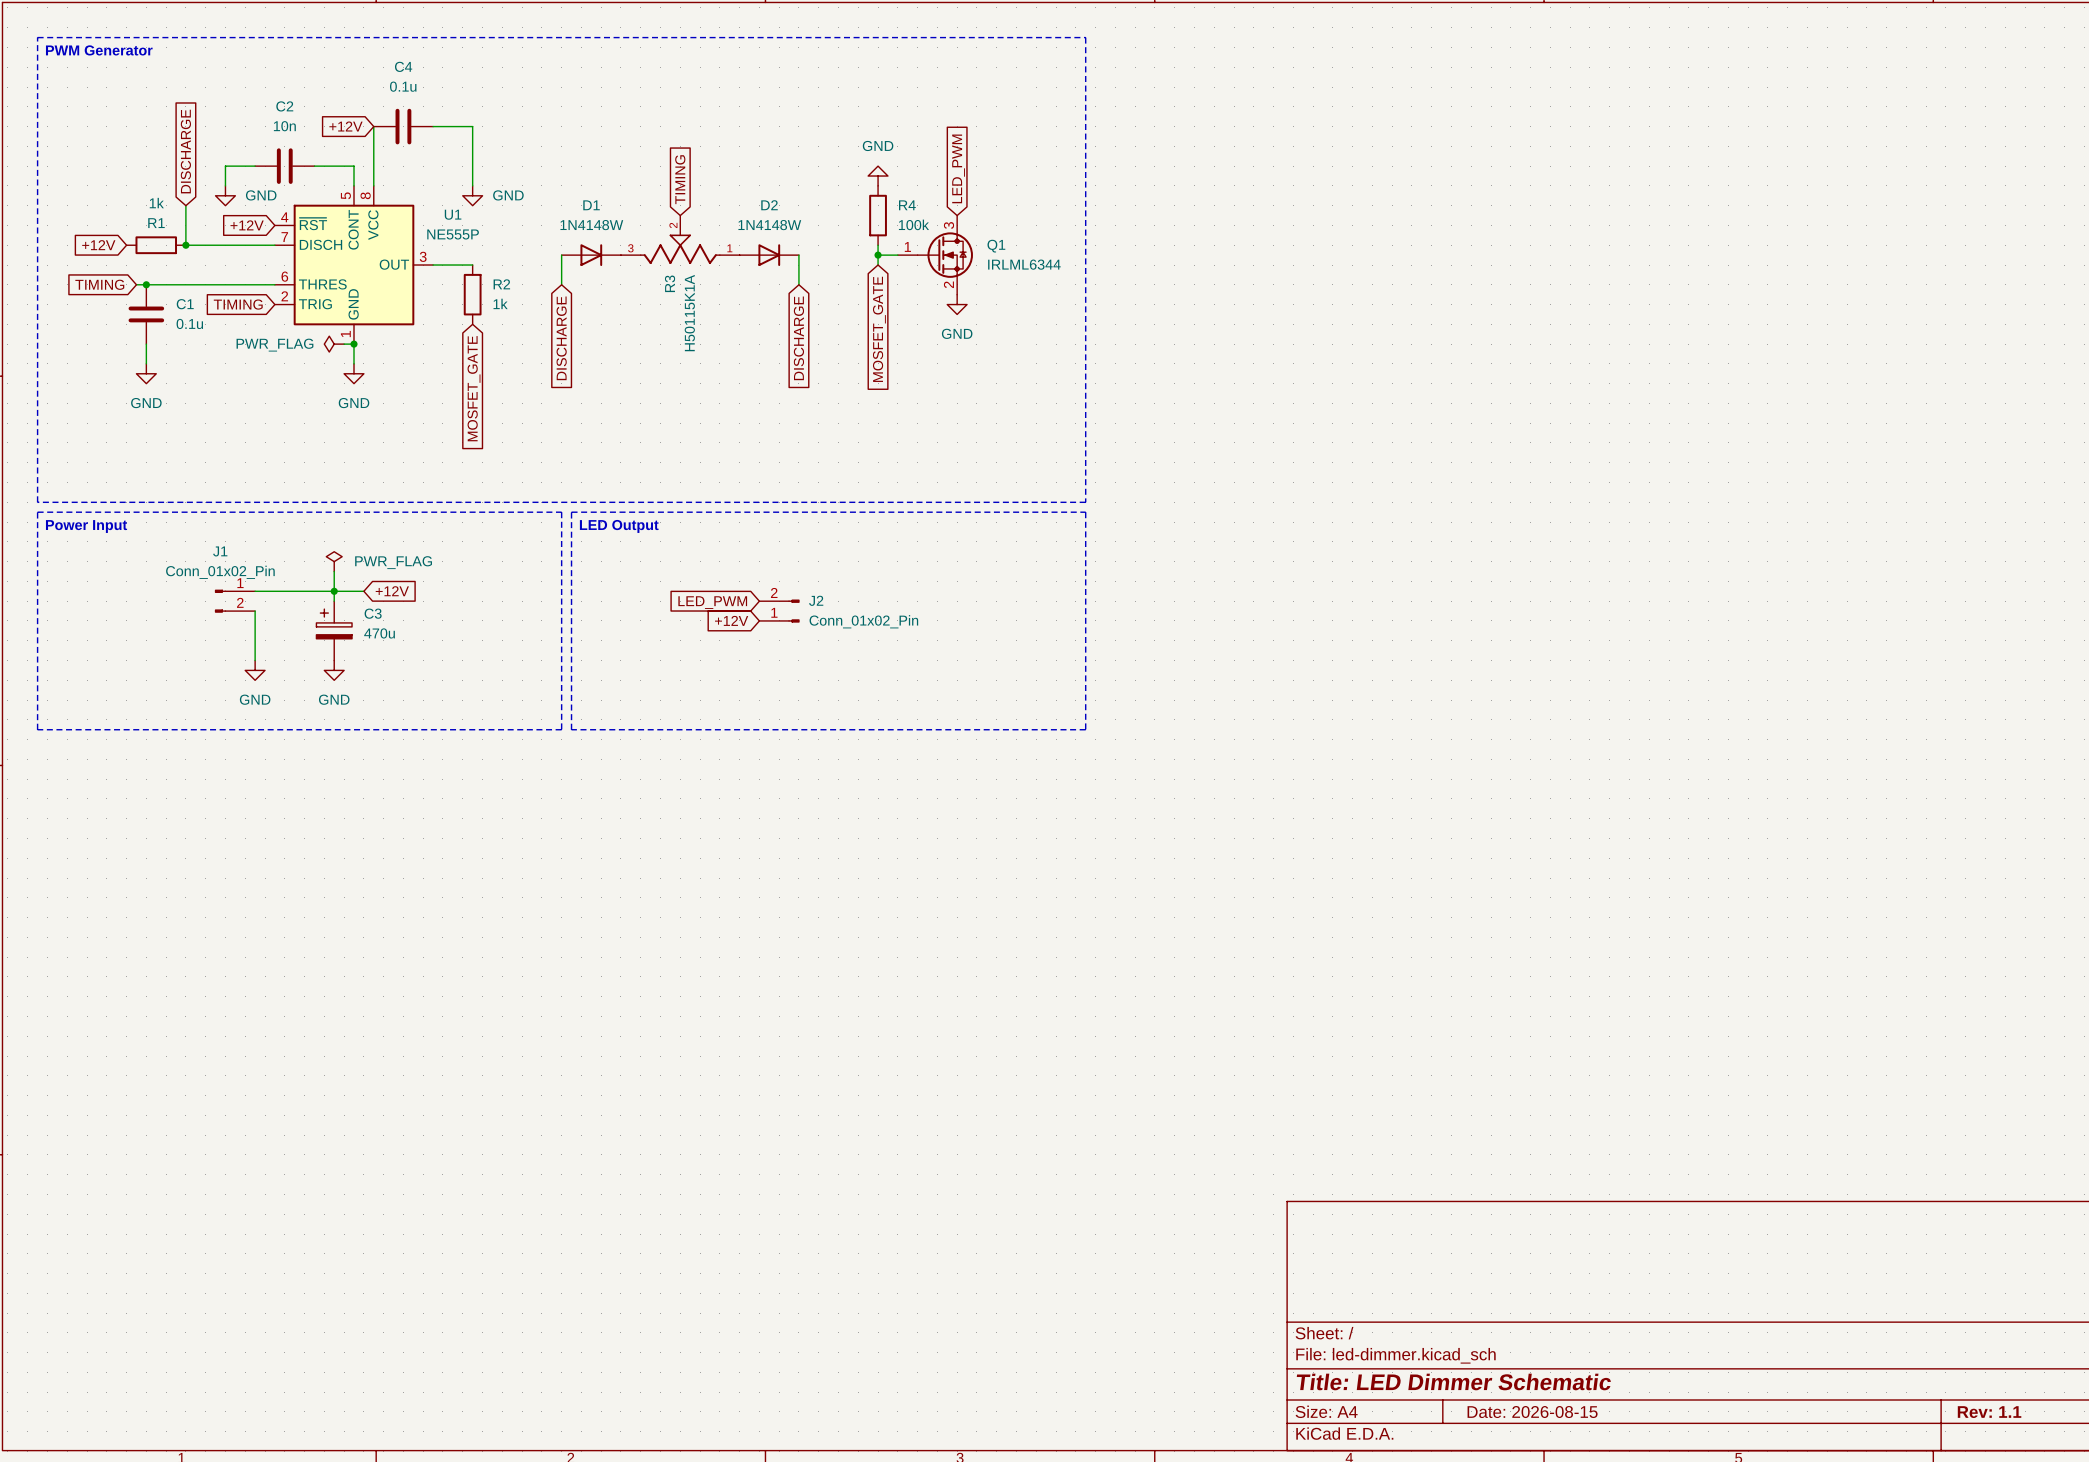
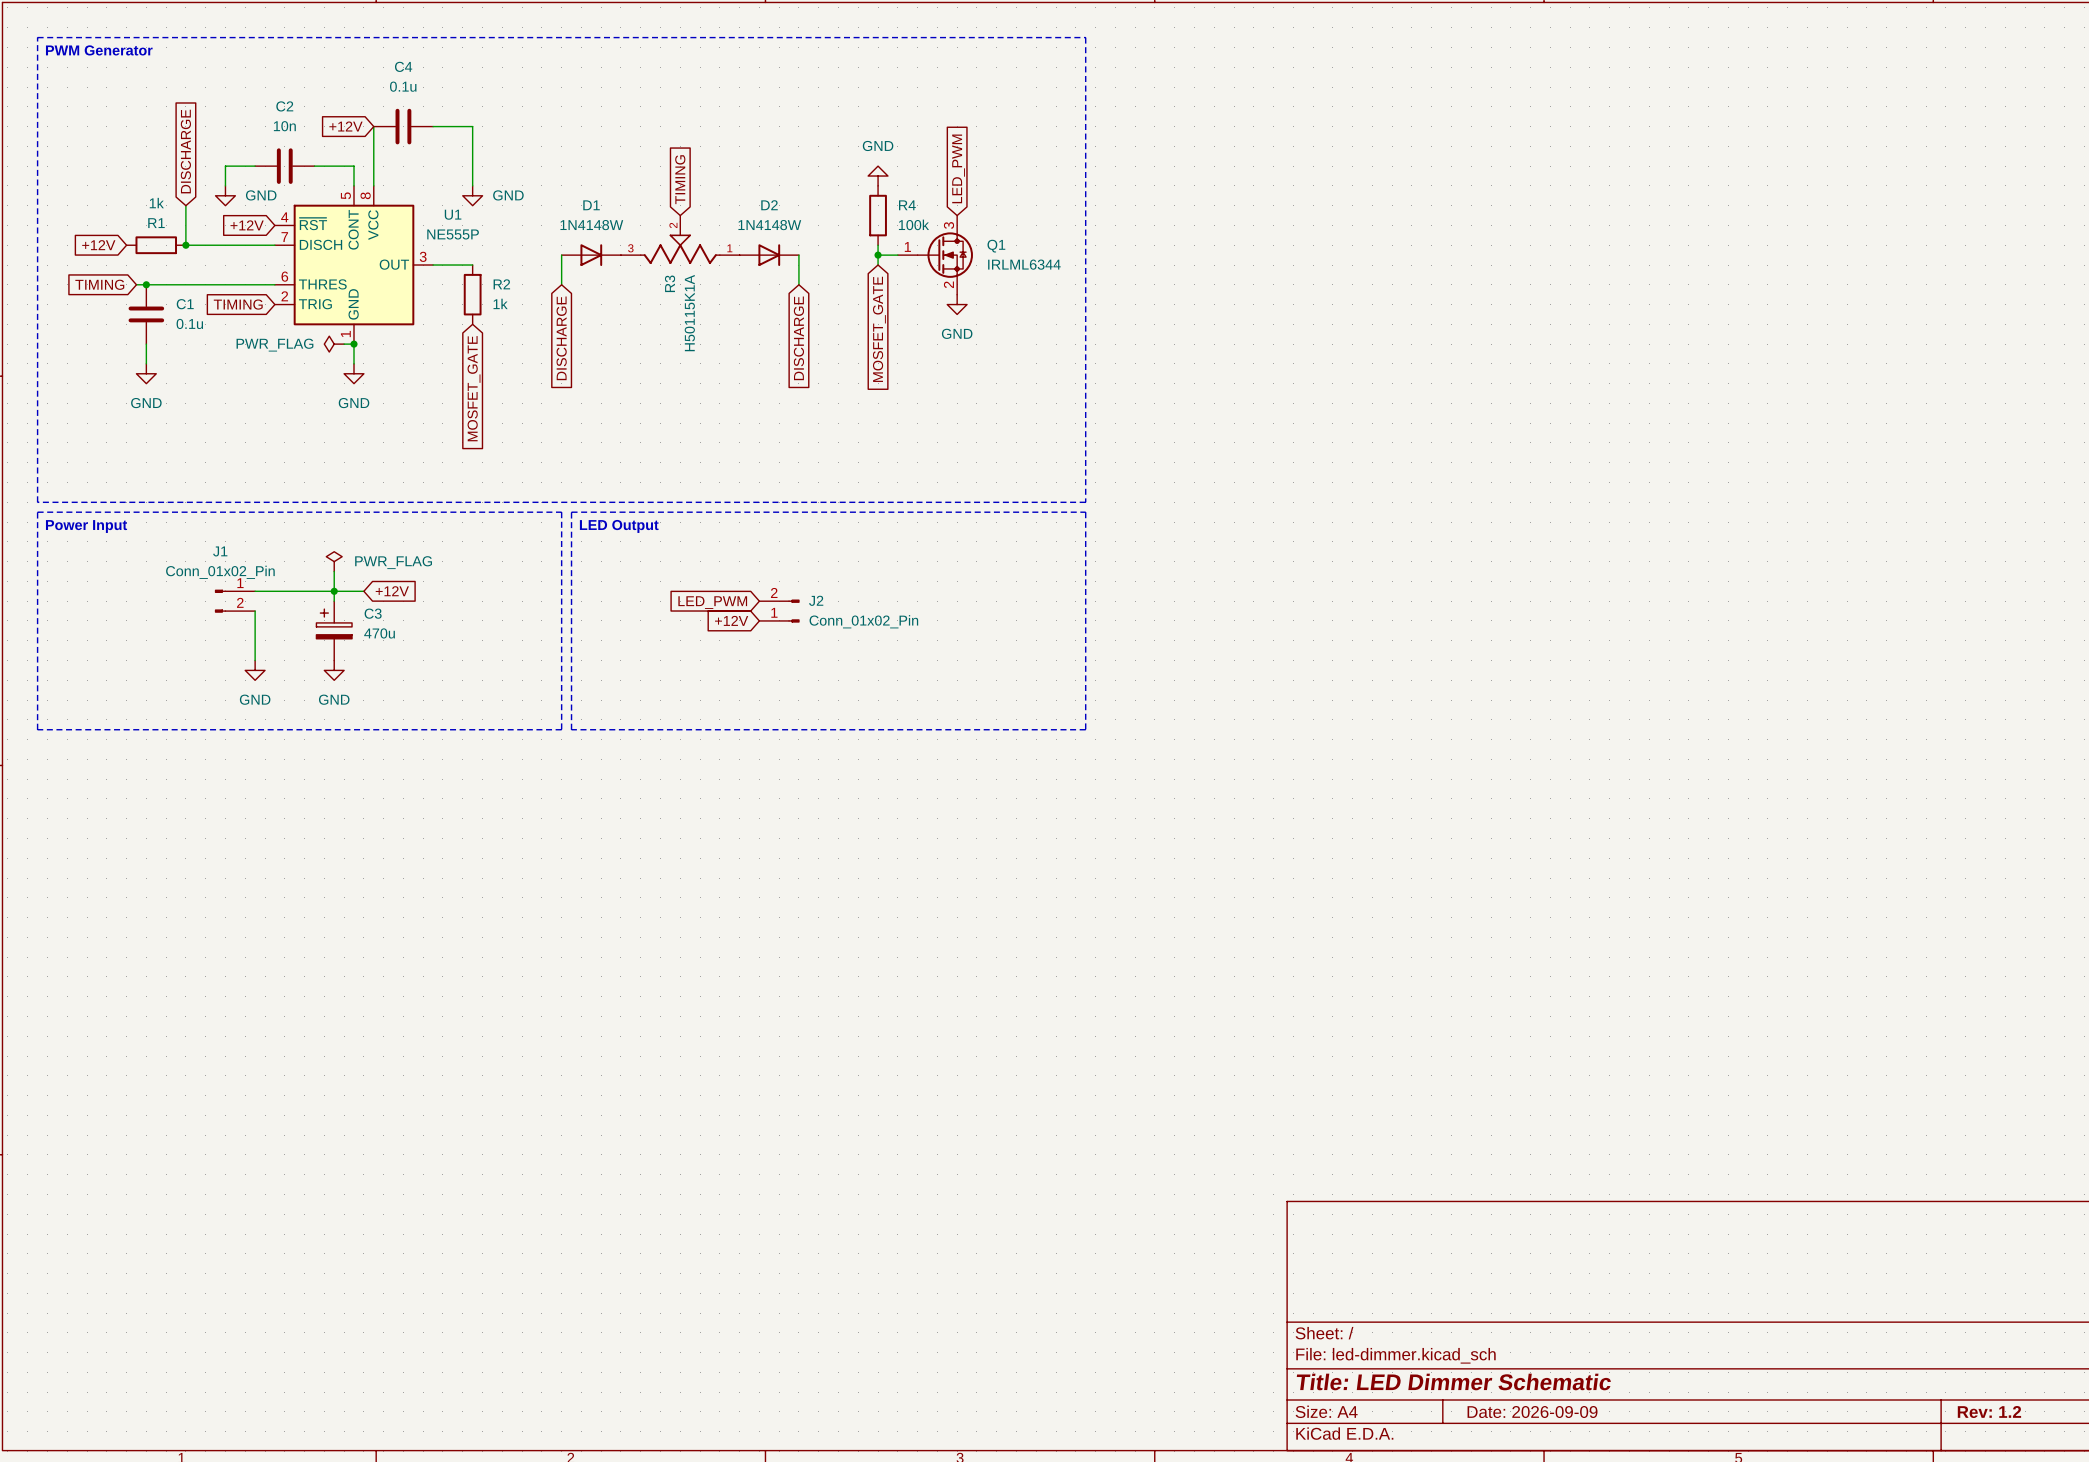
title block: Date: 2026-08-15 (1532, 1412) -> Date: 2026-09-09 (1532, 1412)
title block: Rev: 1.1 (1989, 1412) -> Rev: 1.2 (1989, 1412)

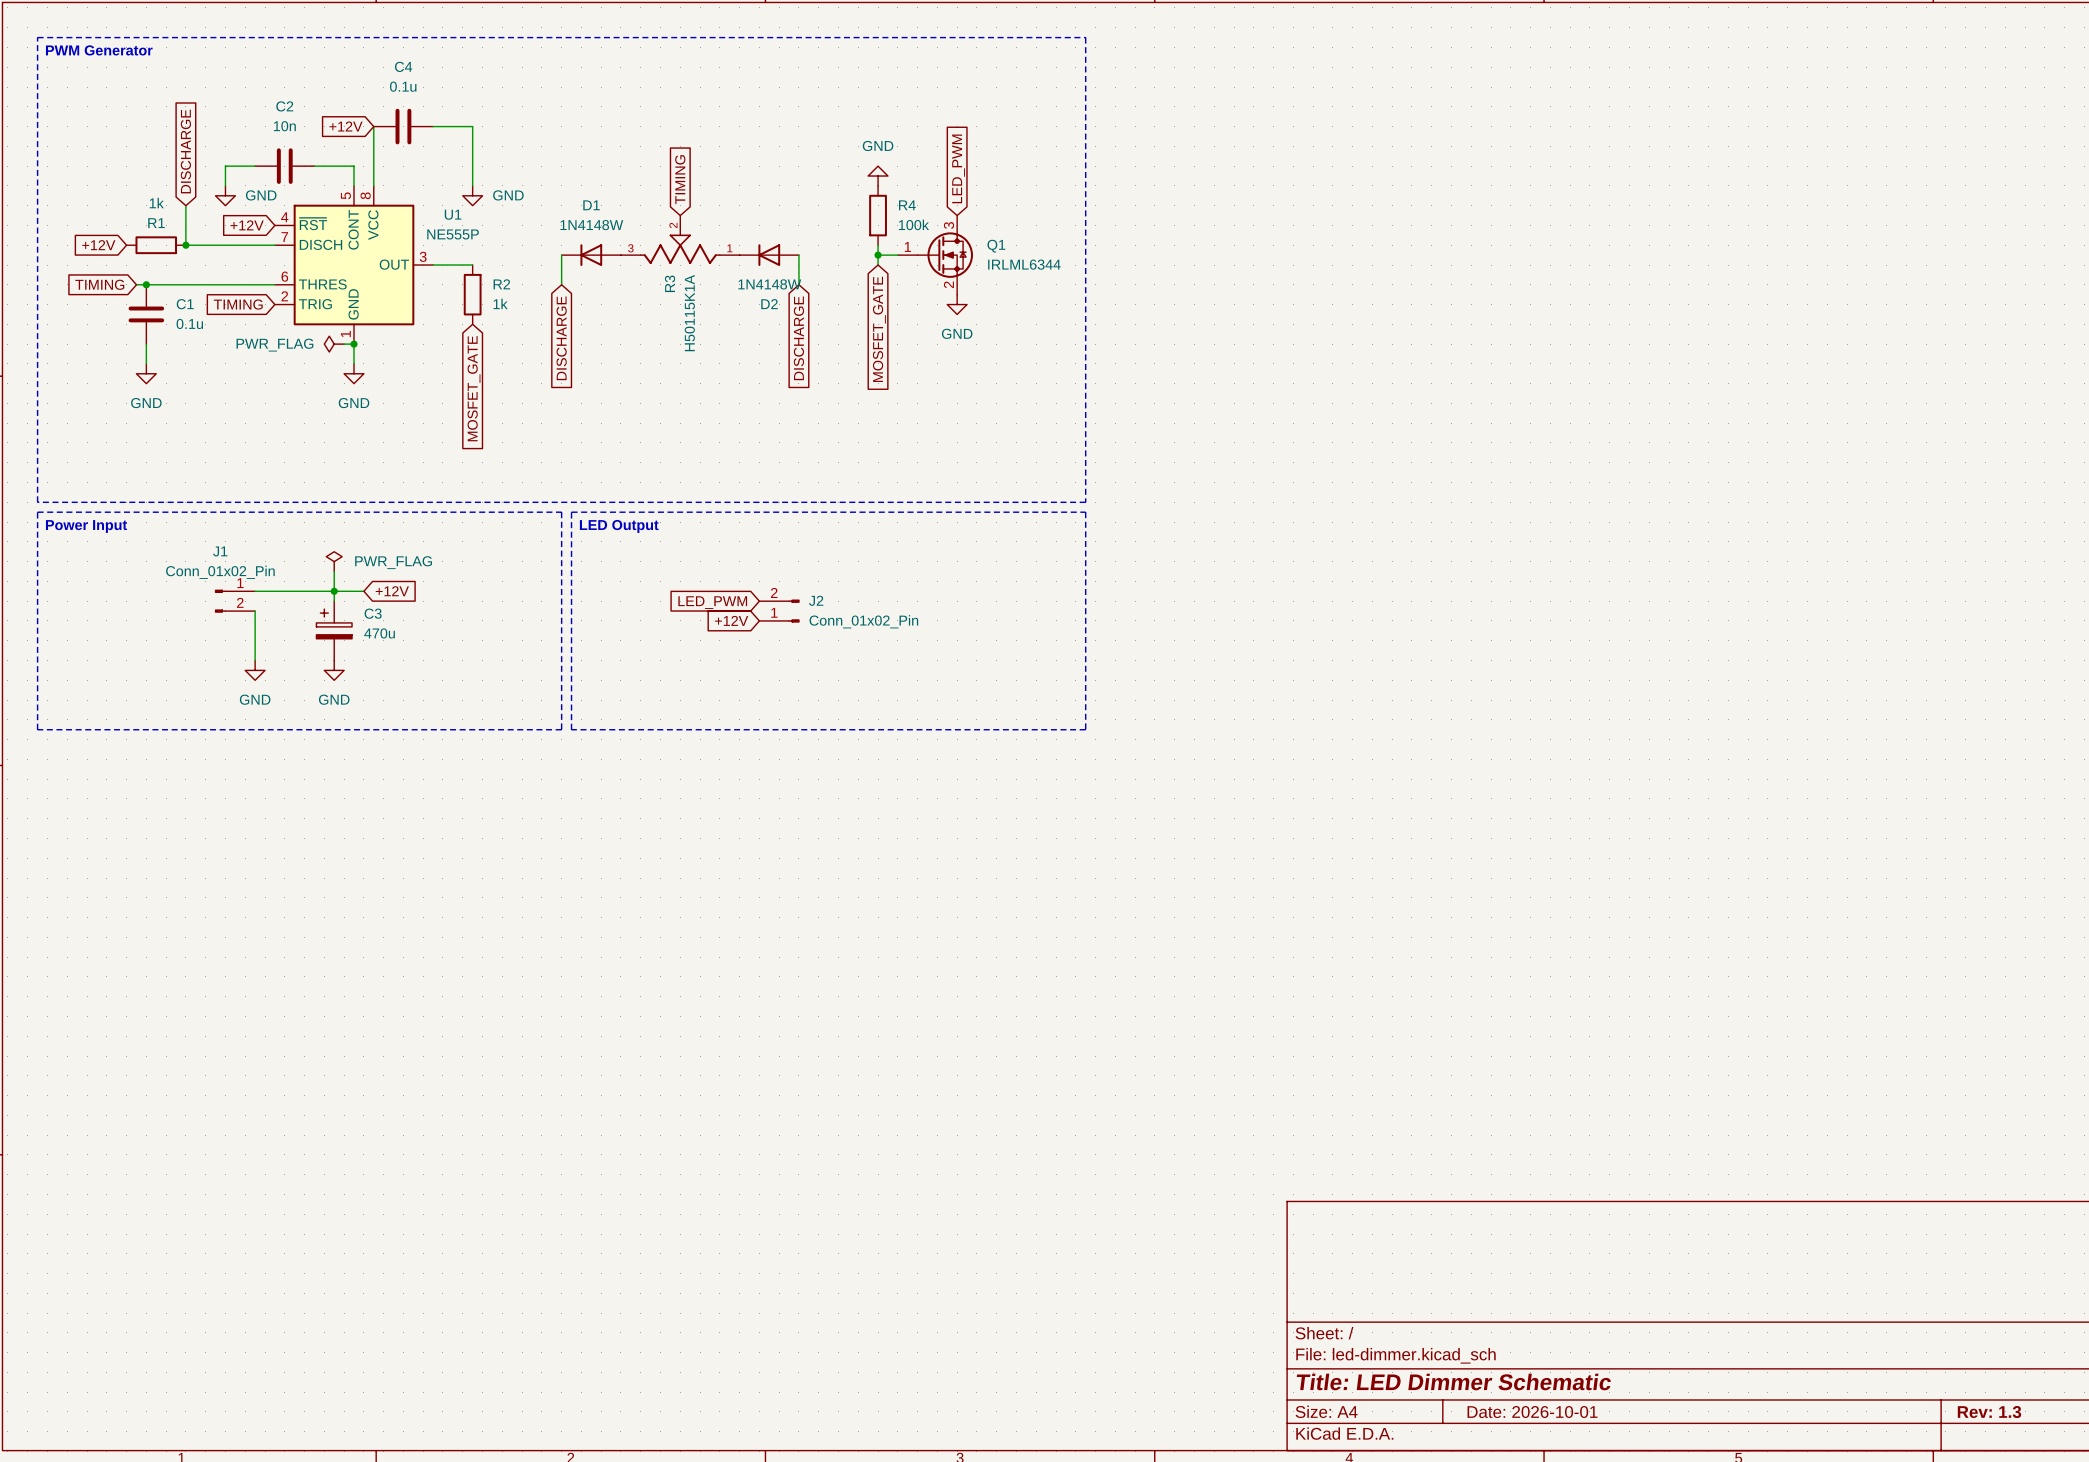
D1 rotation: 0° (591, 255) -> 180° (591, 255)
D2 rotation: 0° (769, 255) -> 180° (769, 255)
title block: Date: 2026-09-09 (1532, 1412) -> Date: 2026-10-01 (1532, 1412)
title block: Rev: 1.2 (1989, 1412) -> Rev: 1.3 (1989, 1412)

